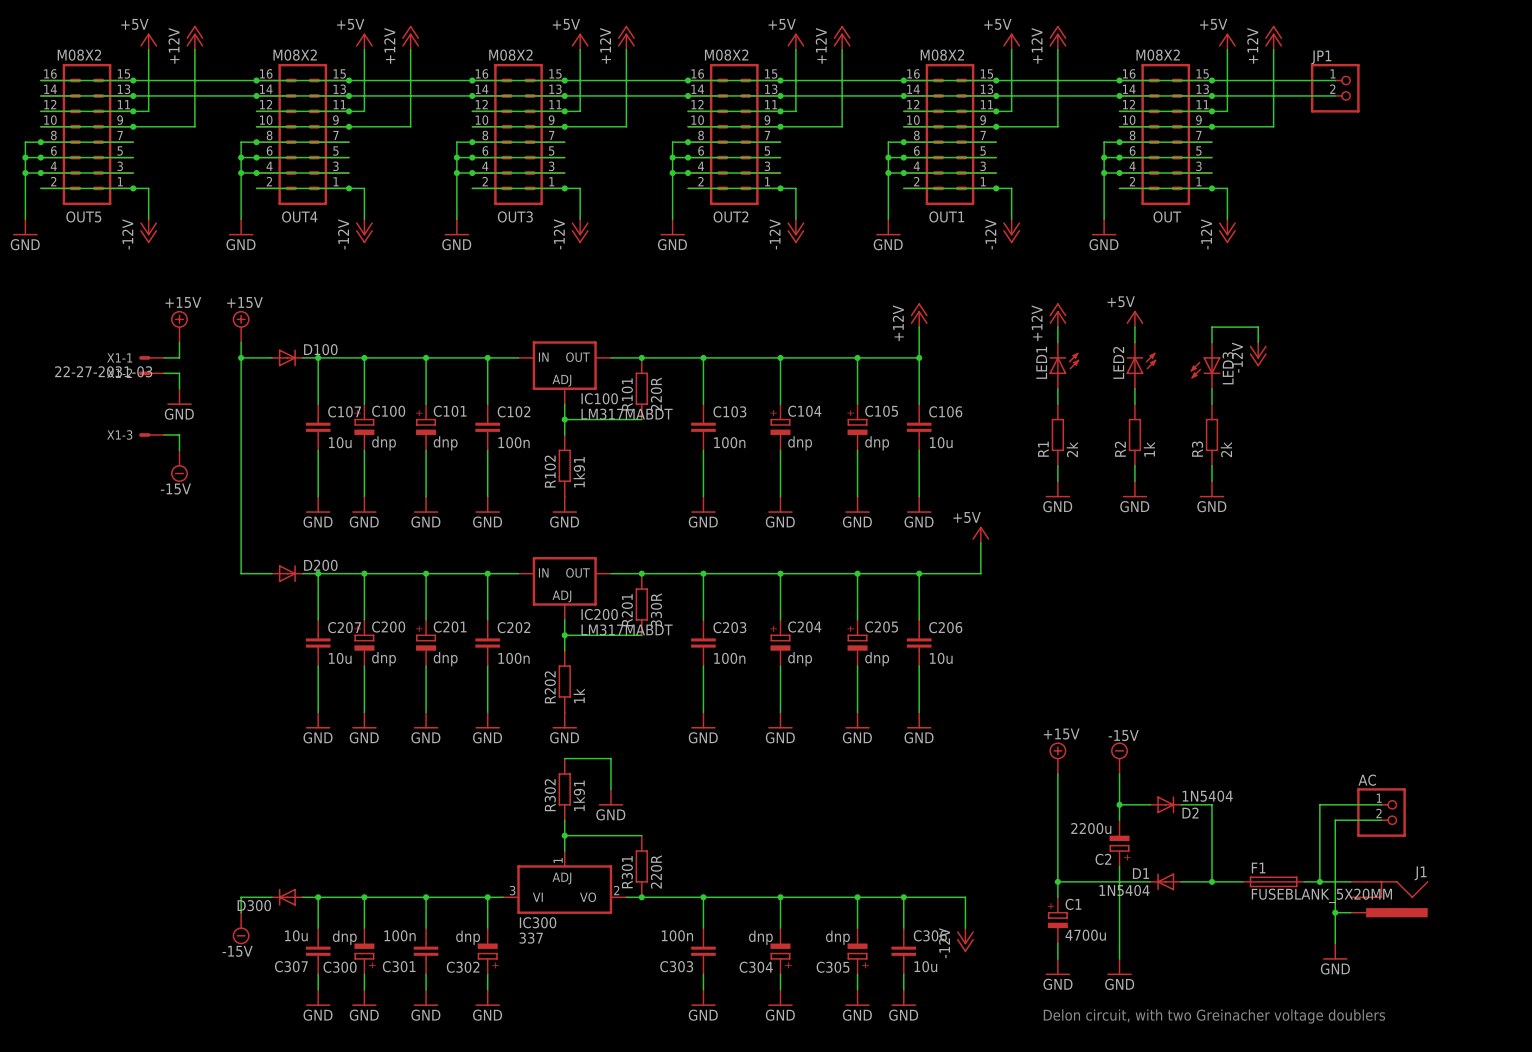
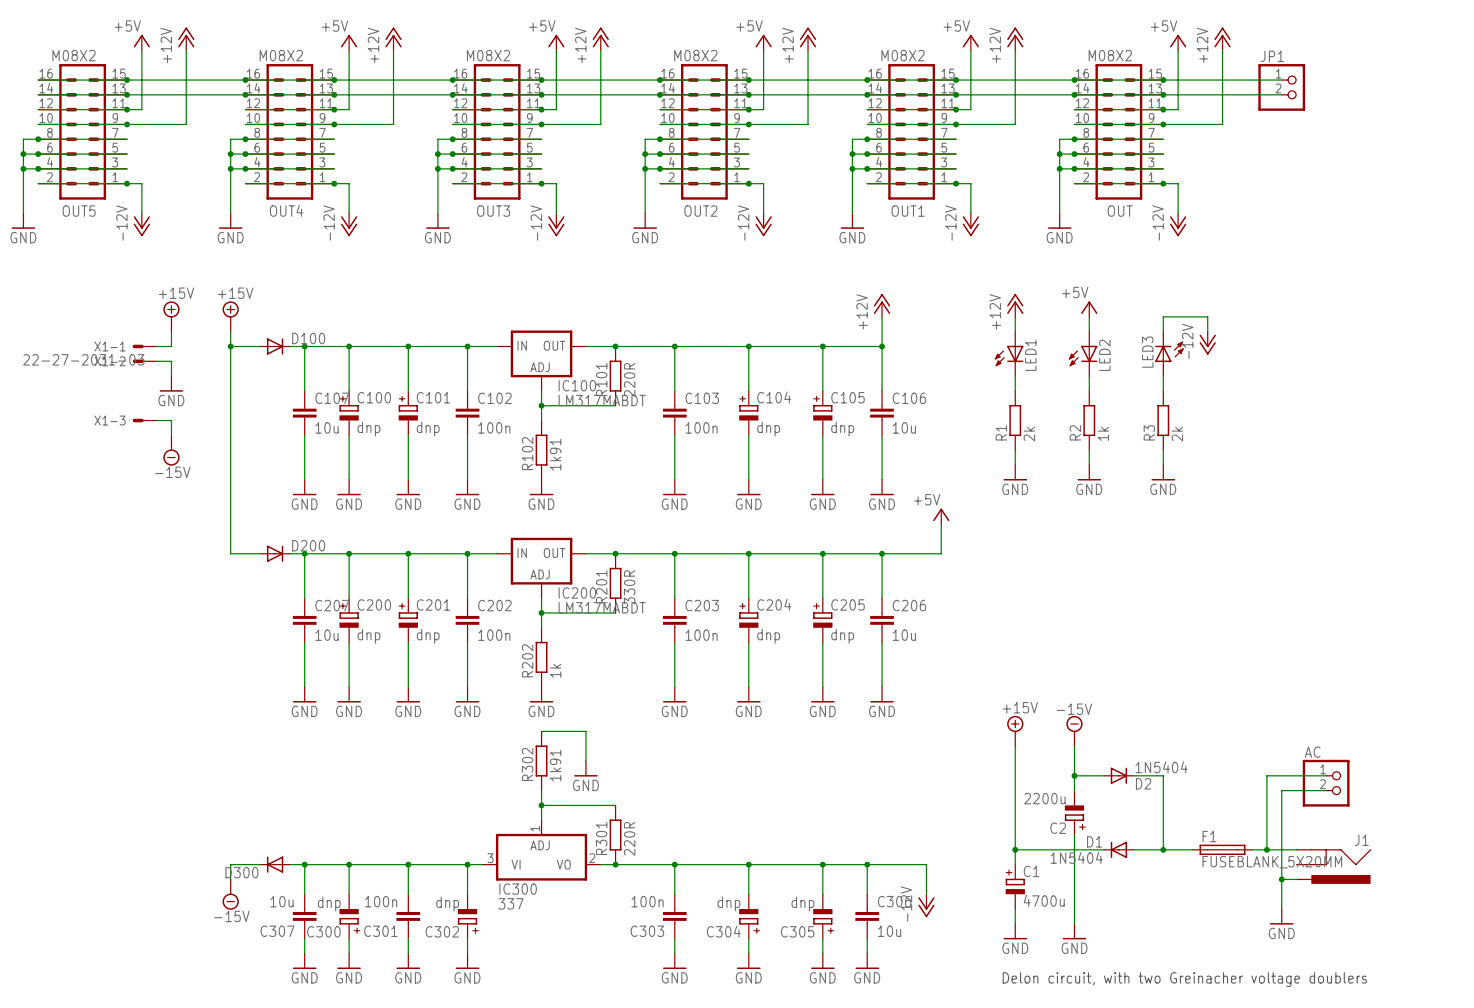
LED1 rotation: 0° (1064, 363) -> 180° (1009, 355)
LED2 rotation: 0° (1141, 363) -> 180° (1083, 355)
LED3 rotation: 0° (1205, 367) -> 180° (1169, 351)

